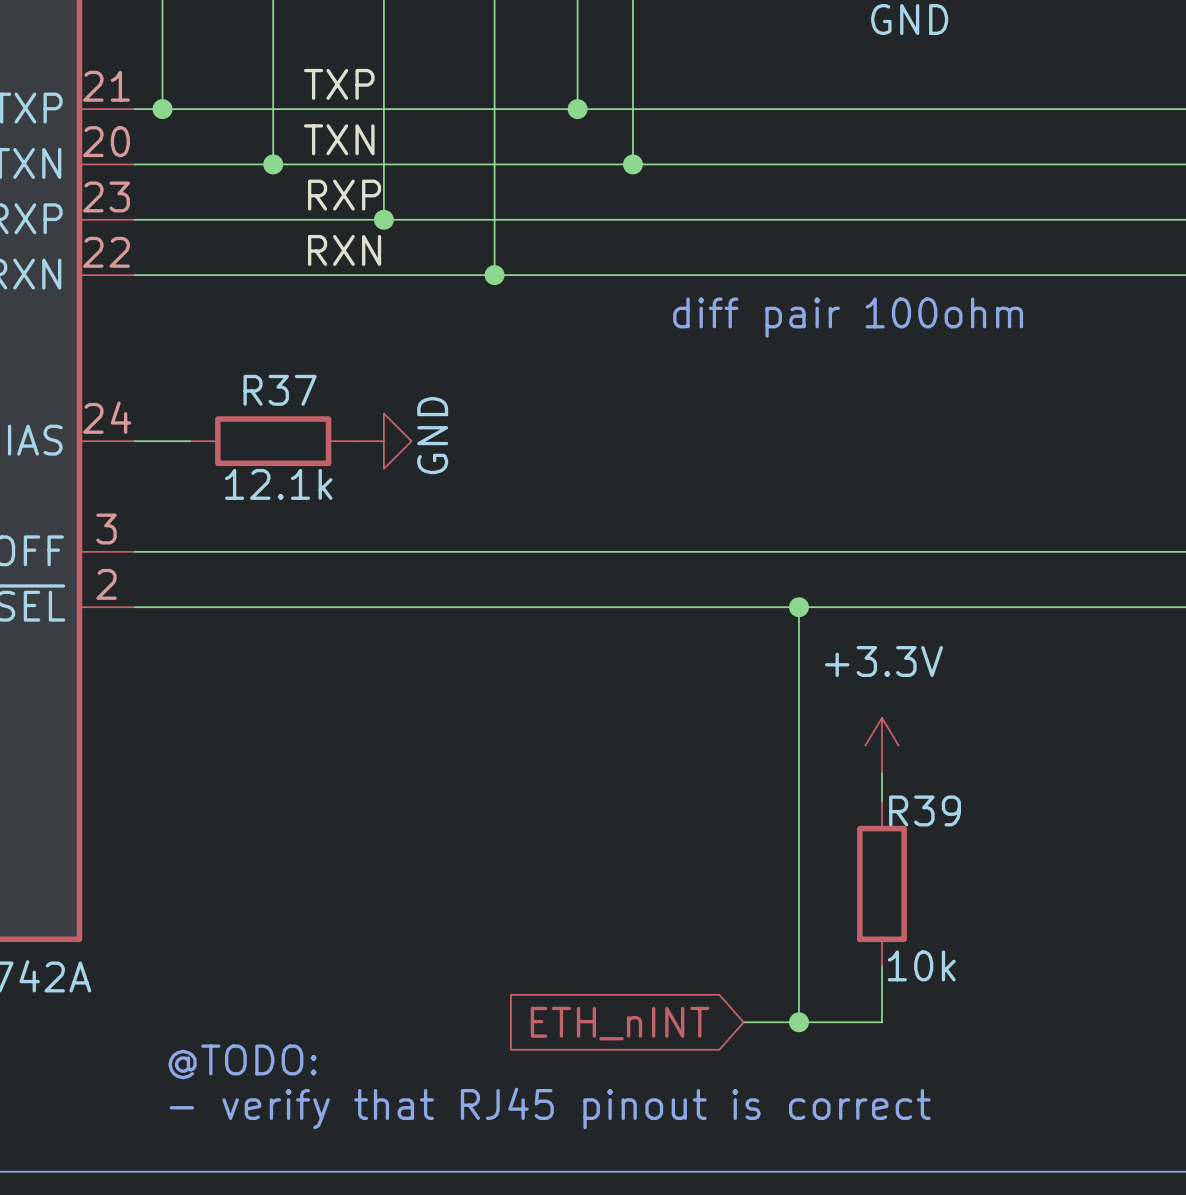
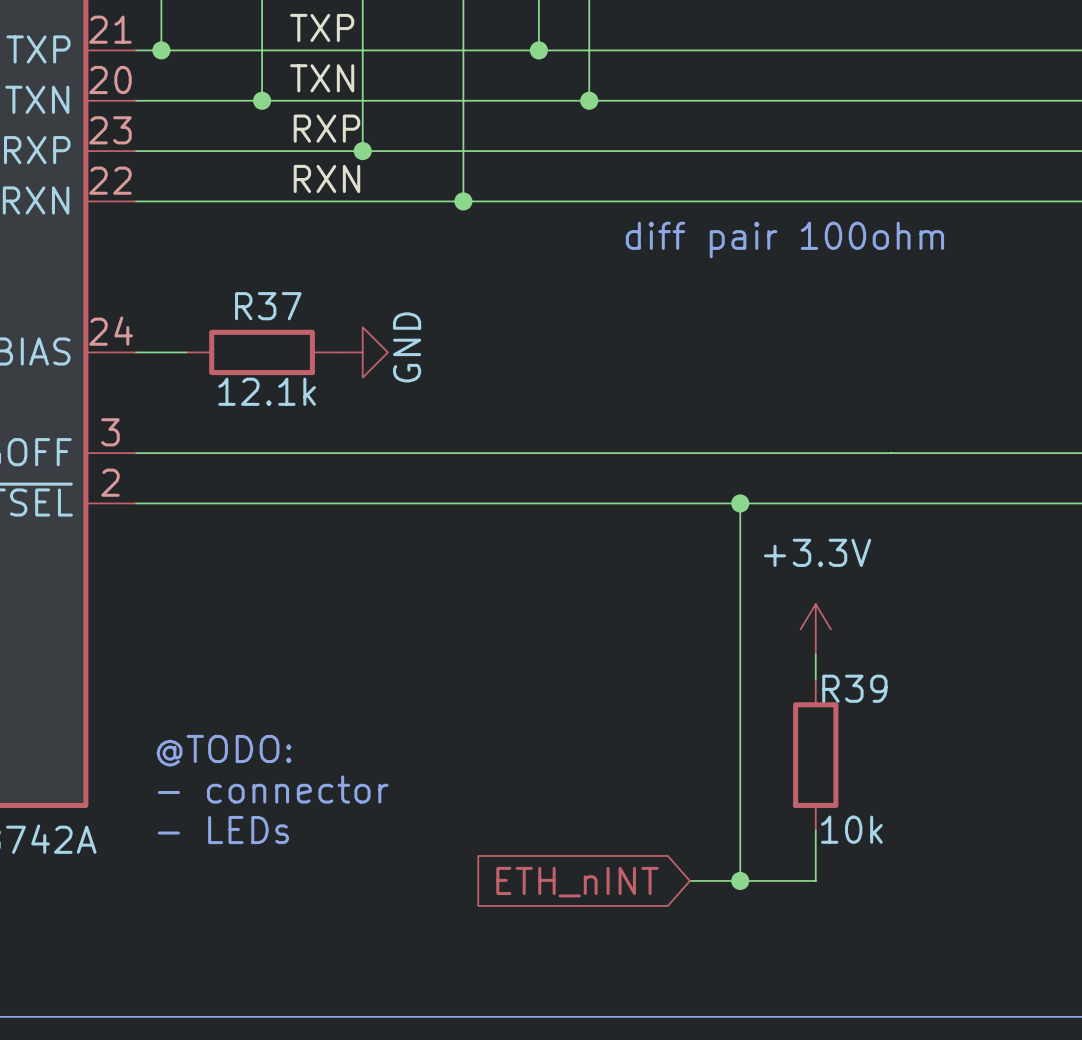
text: none -> - connector (273, 789)
text: none -> - LEDs (223, 830)
text position: @TODO: (242, 1061) -> @TODO: (224, 750)
text: - verify that RJ45 pinout is correct (550, 1108) -> none

